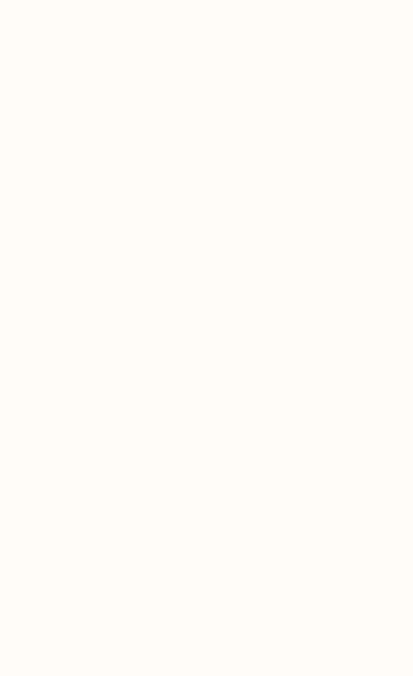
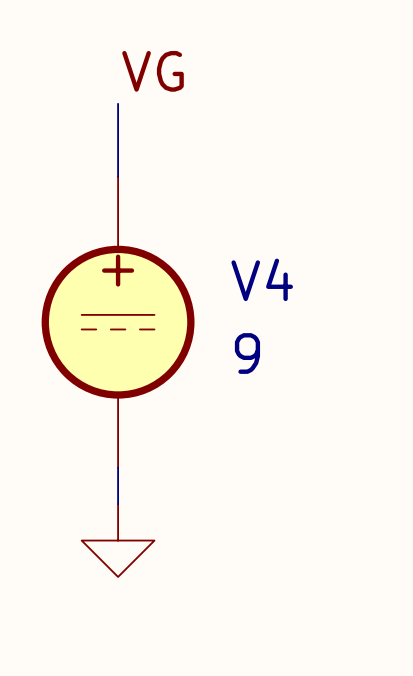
label: none -> VG (153, 71)
wire: none -> (118, 103) (118, 176)
V4: none -> 9 (118, 322)
wire: none -> (118, 467) (118, 504)
power symbol: none -> (118, 540)

